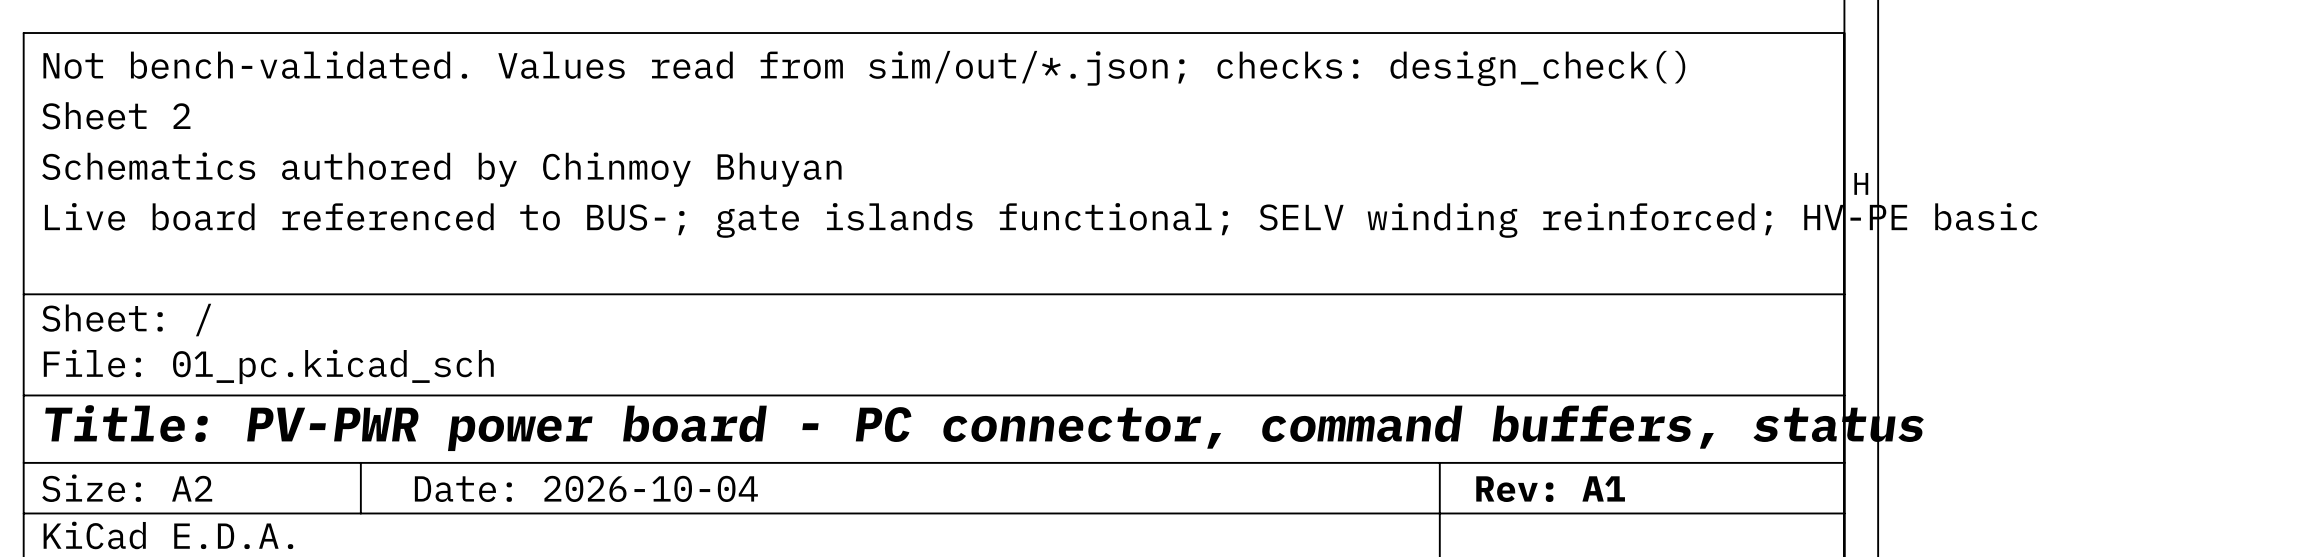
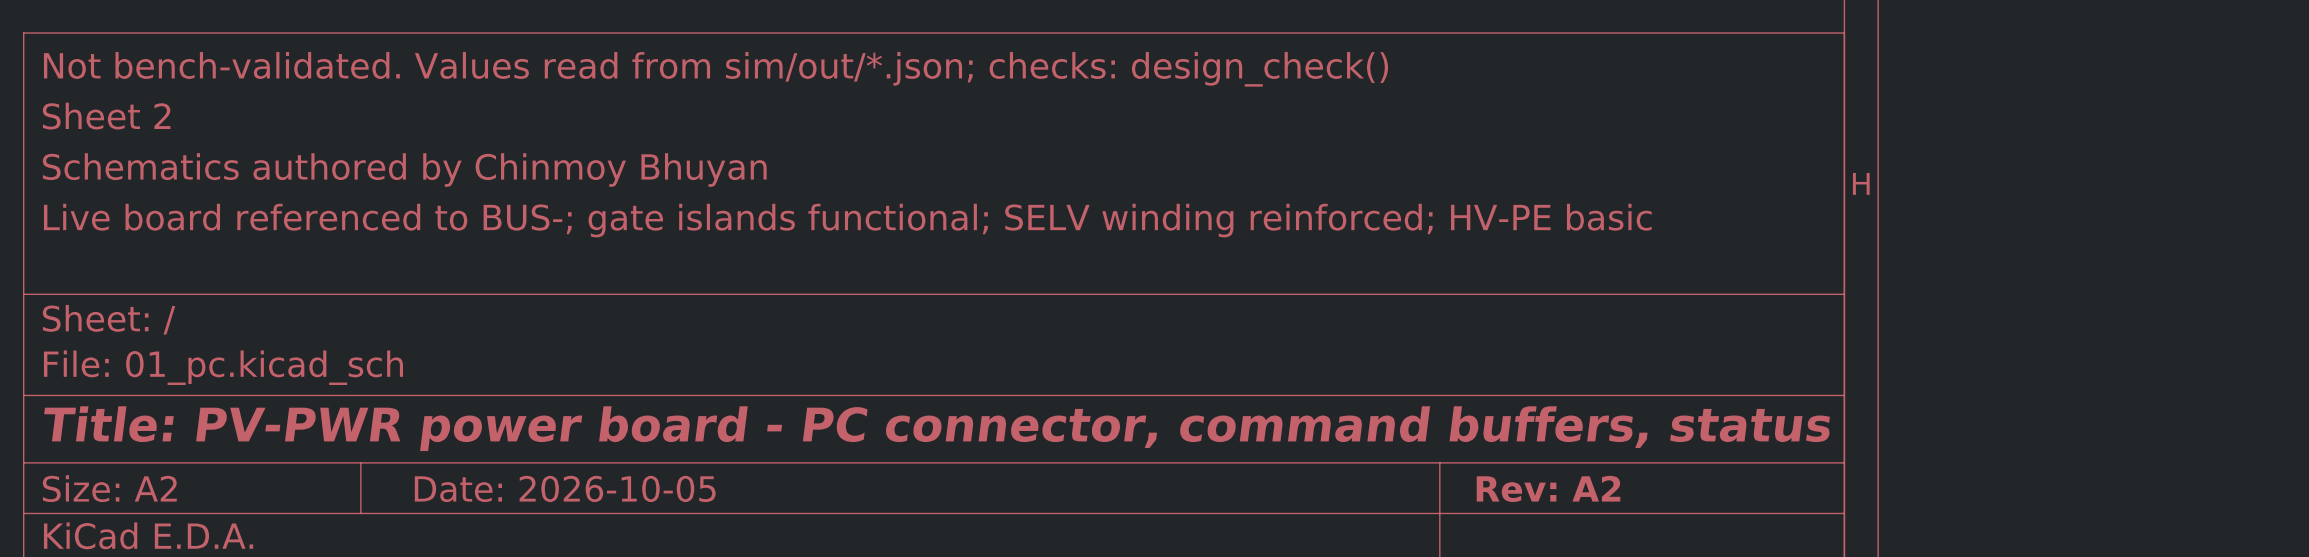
title block: Date: 2026-10-04 (586, 488) -> Date: 2026-10-05 (565, 488)
title block: Rev: A1 (1550, 489) -> Rev: A2 (1548, 488)

